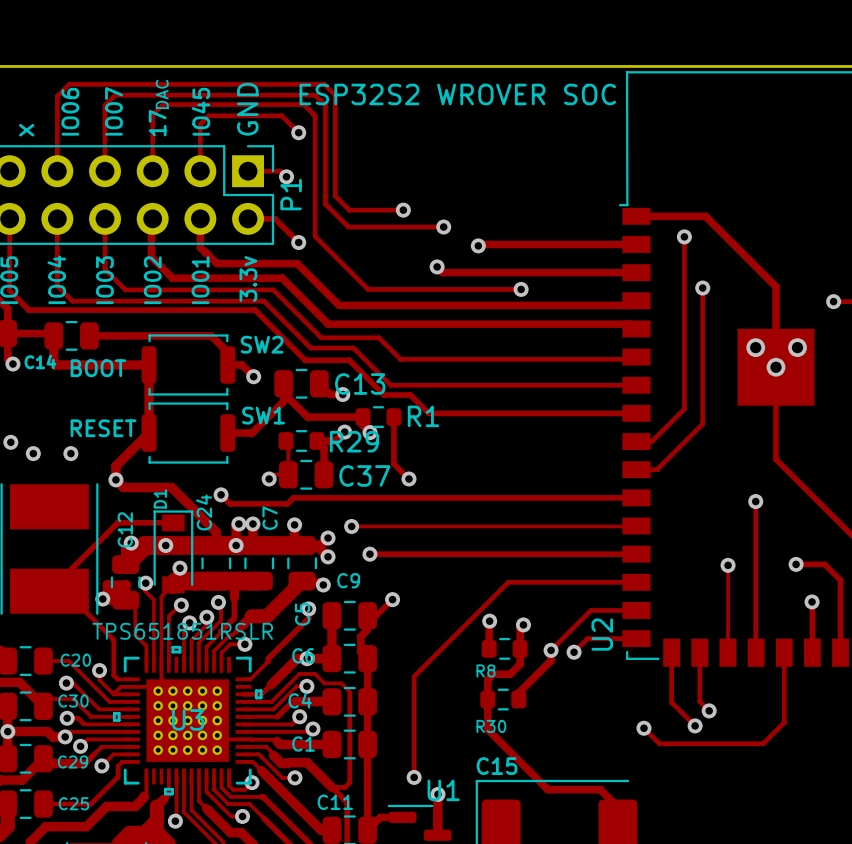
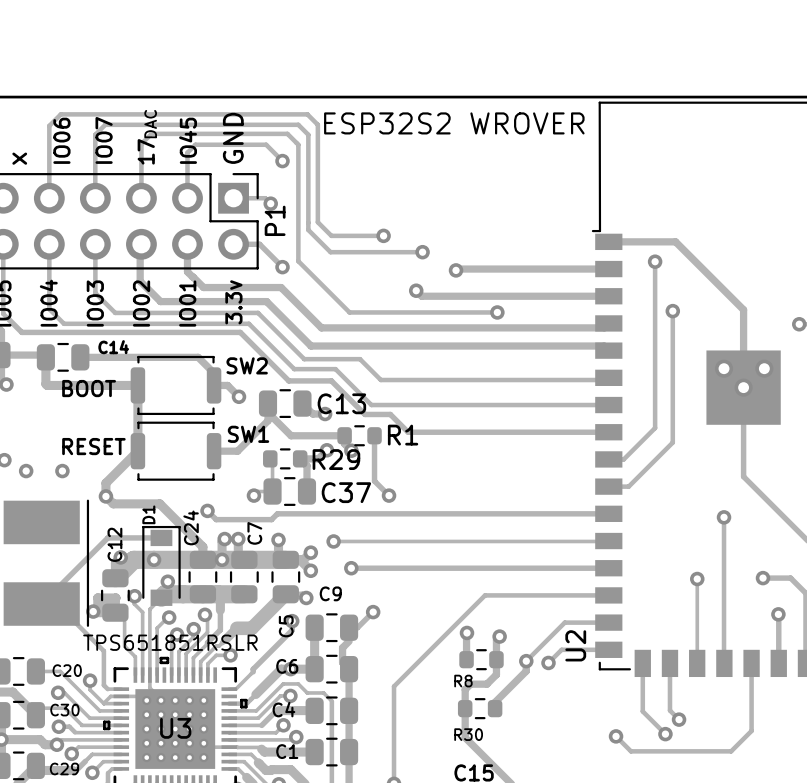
text: ESP32S2 WROVER SOC (457, 94) -> ESP32S2 WROVER (454, 123)
C14 name position: C14 (40, 361) -> C14 (113, 347)

